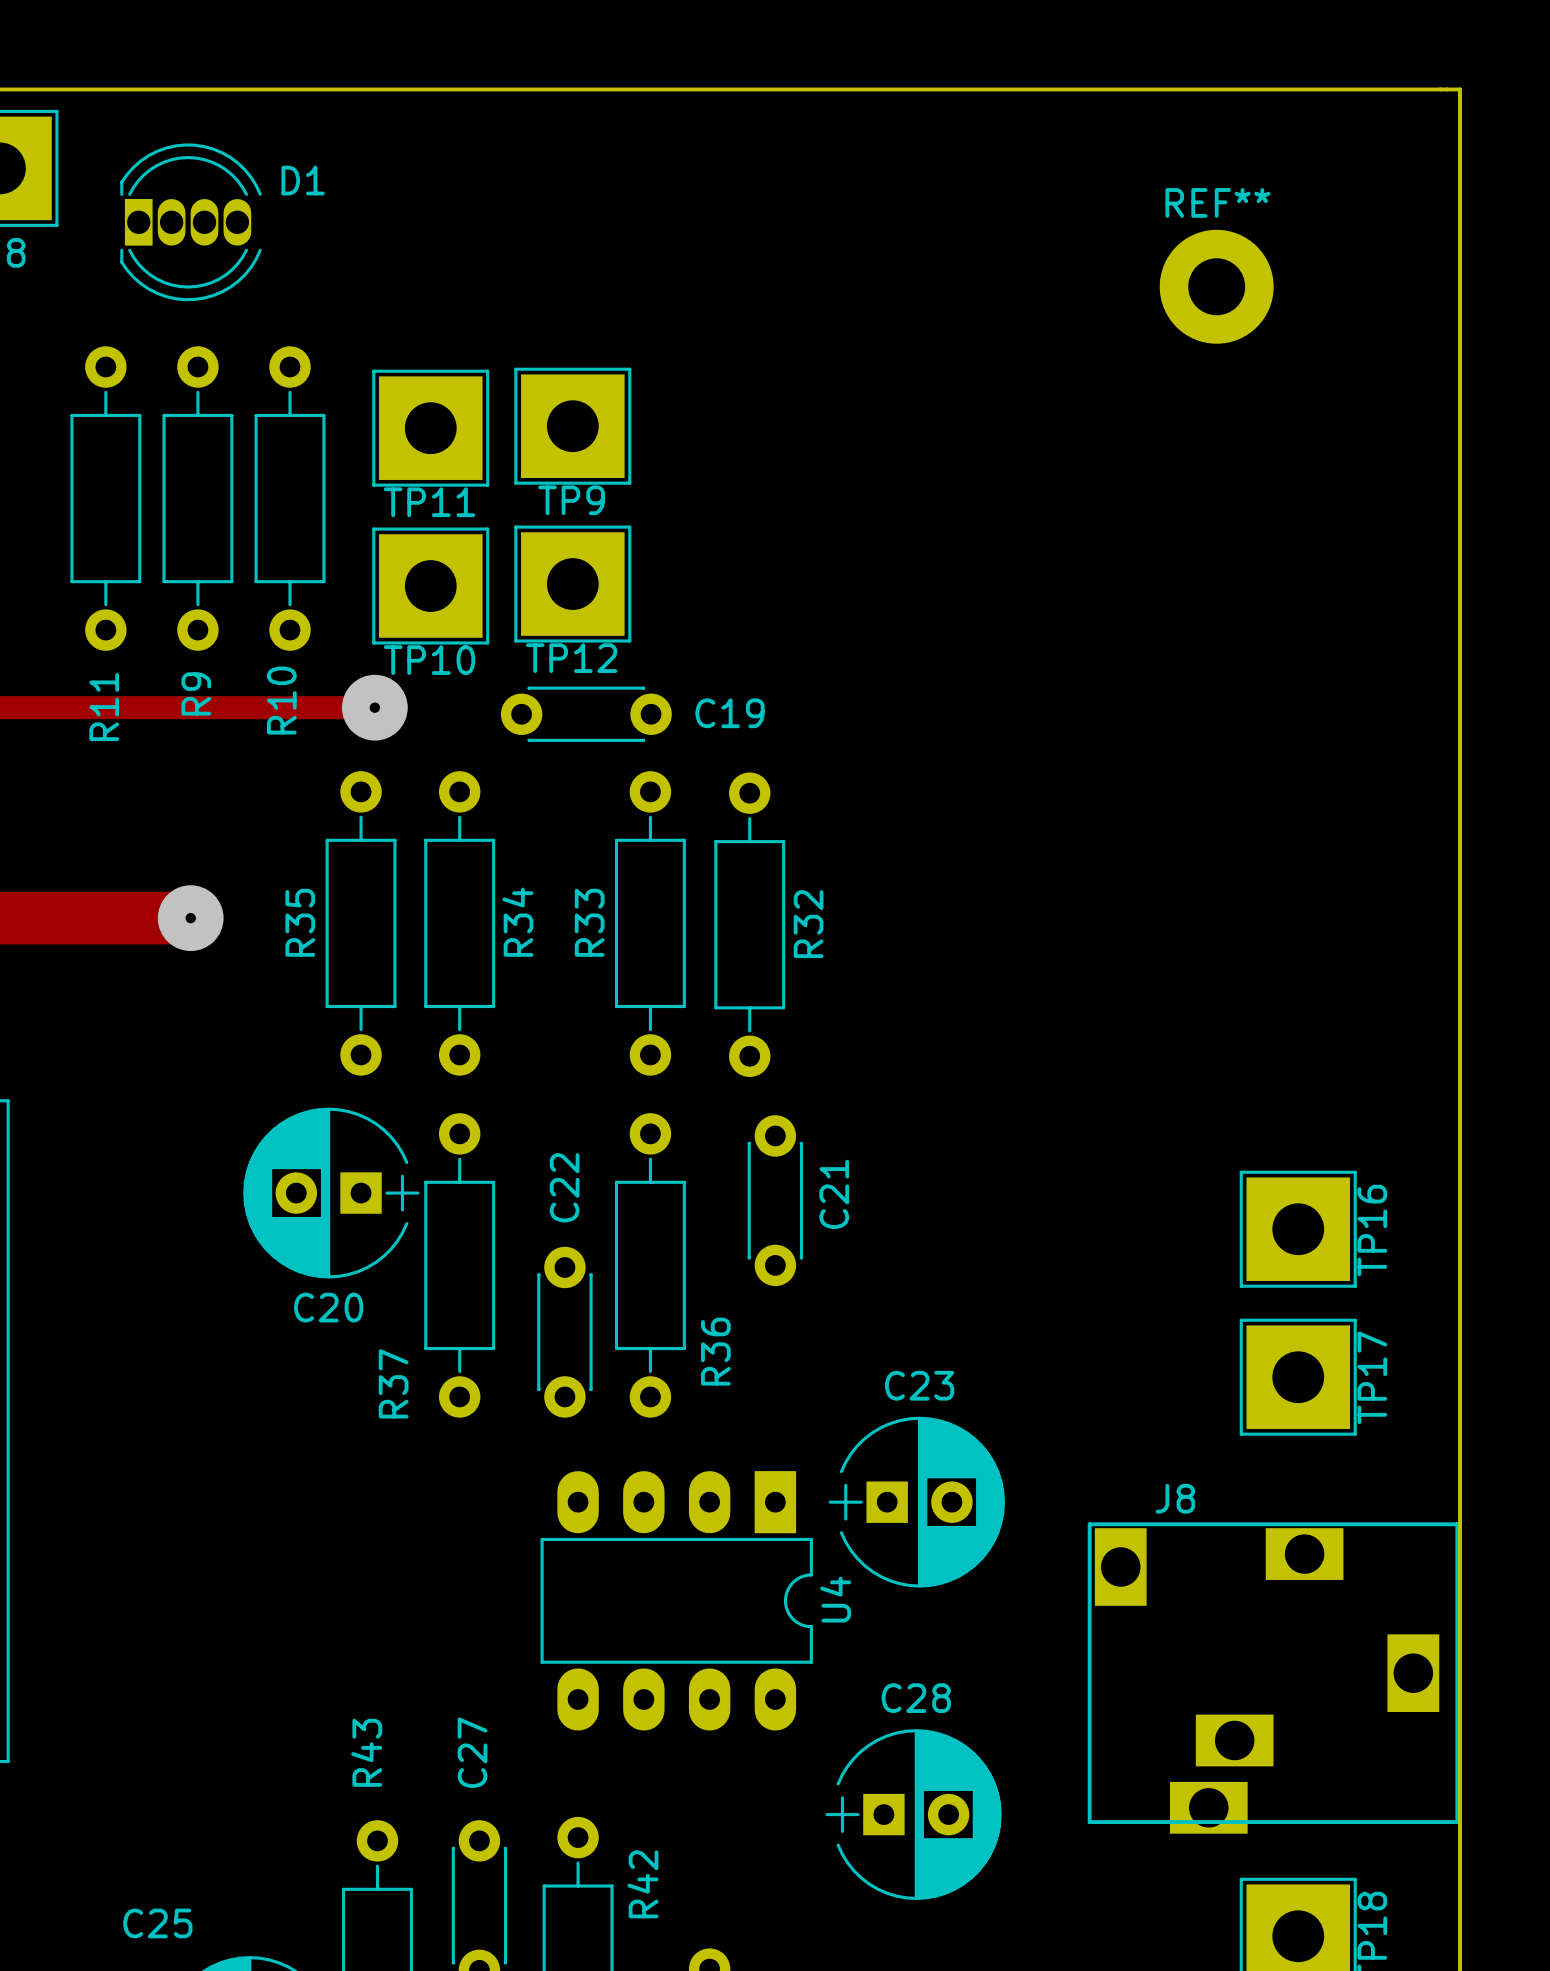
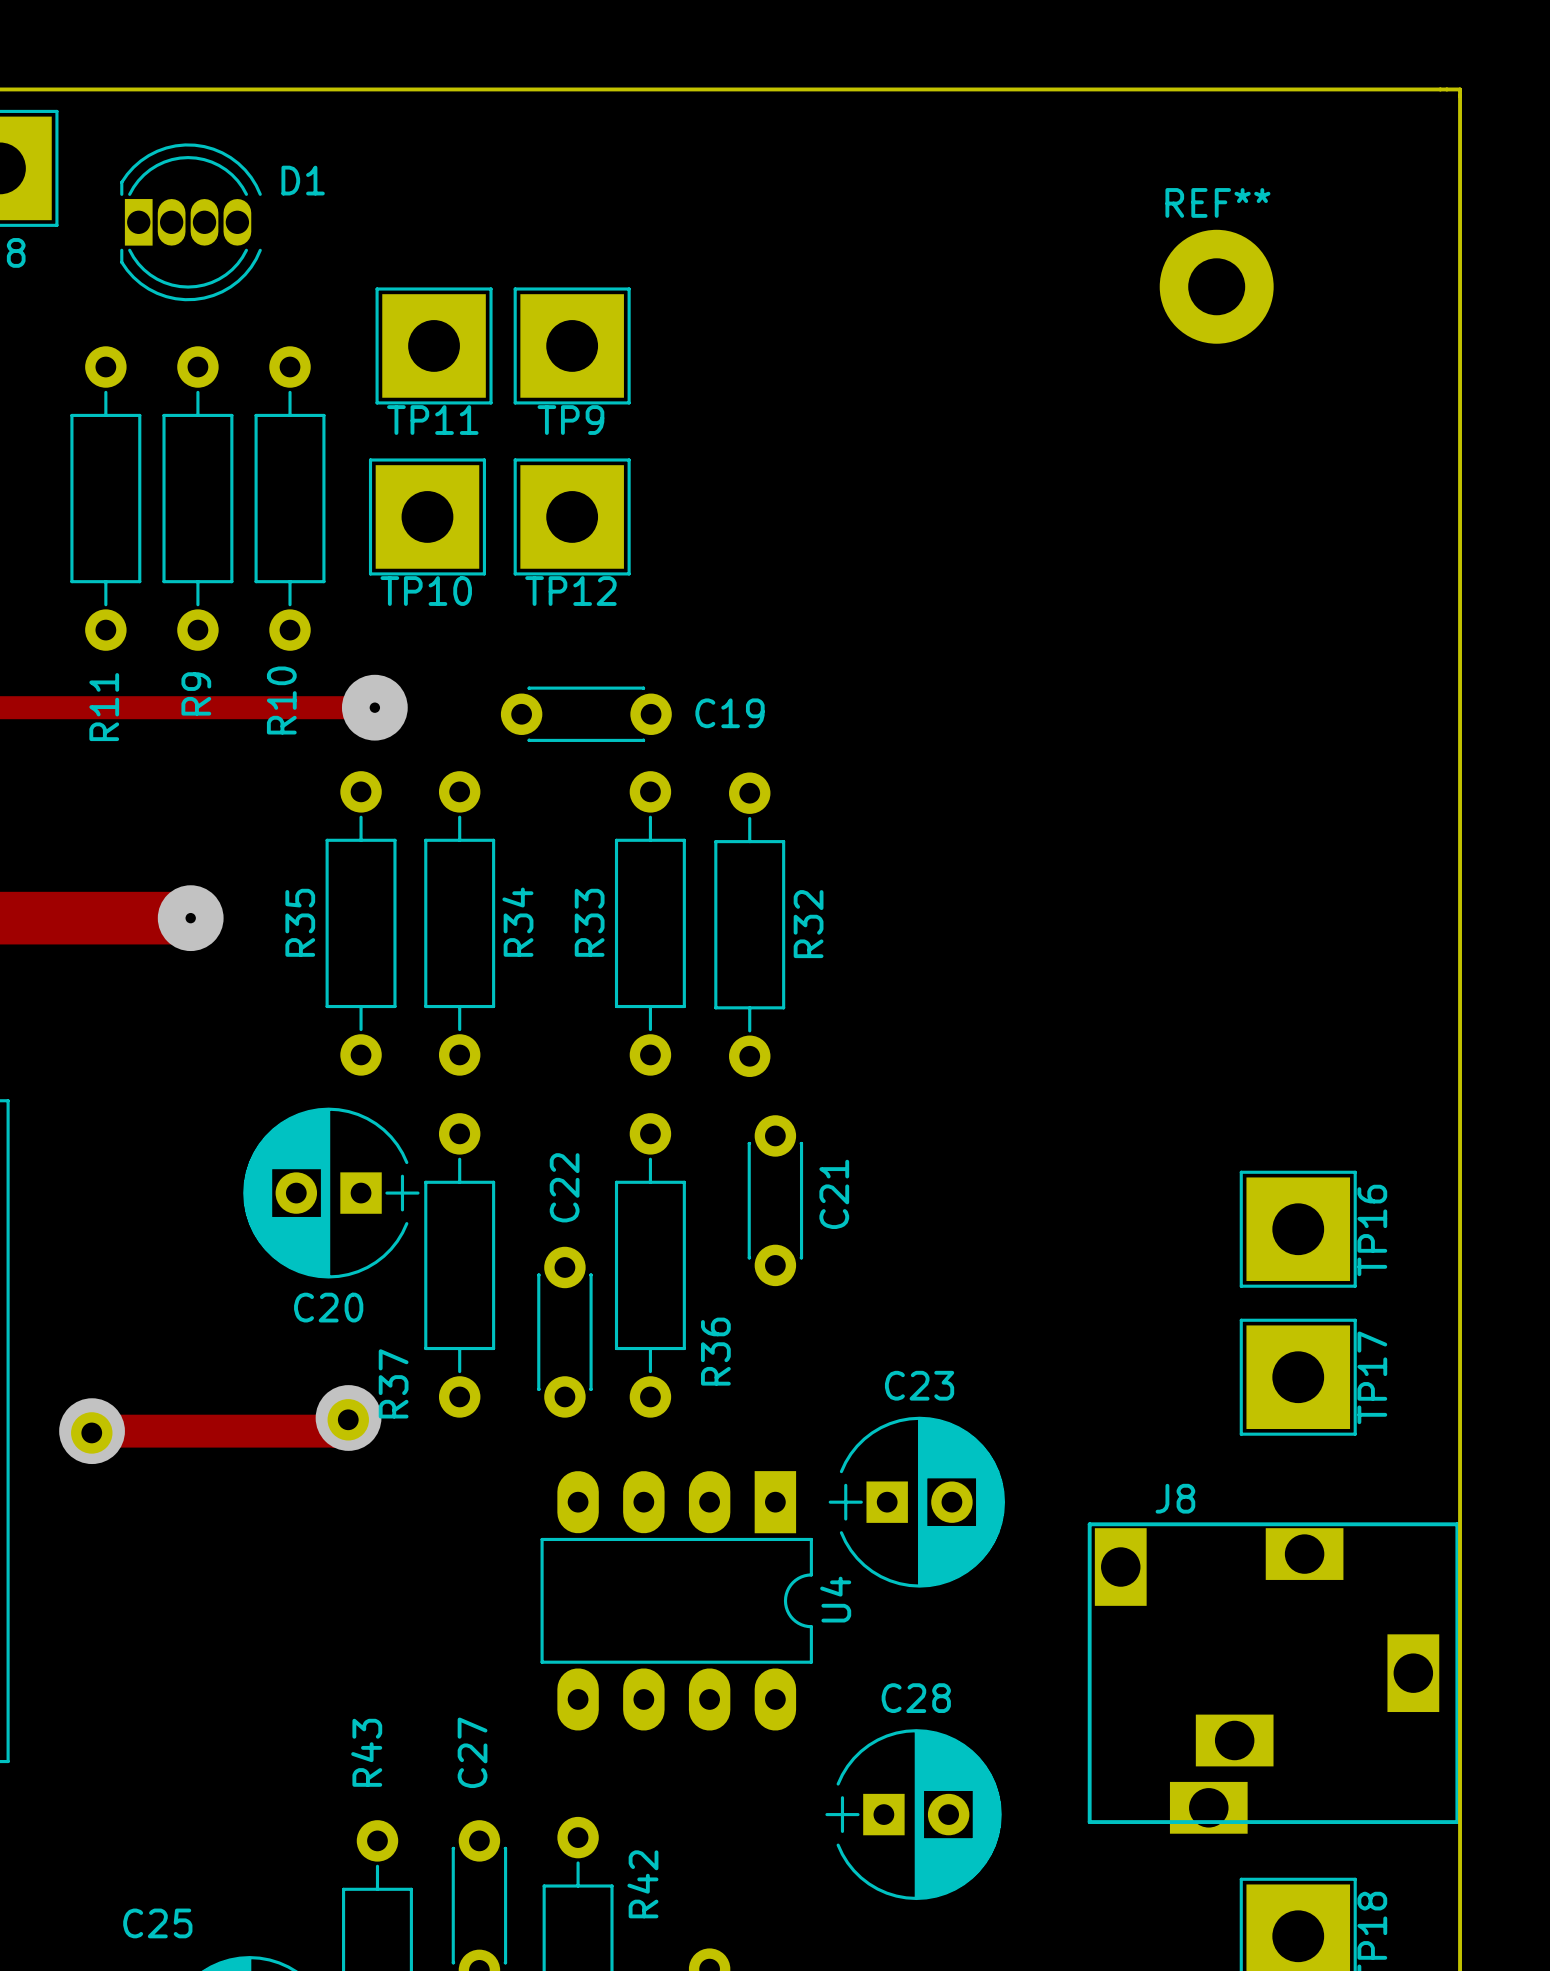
TP9 position: (572, 426) -> (572, 345)
TP11 position: (430, 428) -> (434, 345)
TP12 position: (572, 584) -> (572, 516)
TP10 position: (430, 586) -> (427, 516)
track: none -> (348, 1417) (335, 1431) (92, 1431)
via: none -> (348, 1417)
part: none -> (348, 1419)
via: none -> (92, 1431)
part: none -> (91, 1432)

